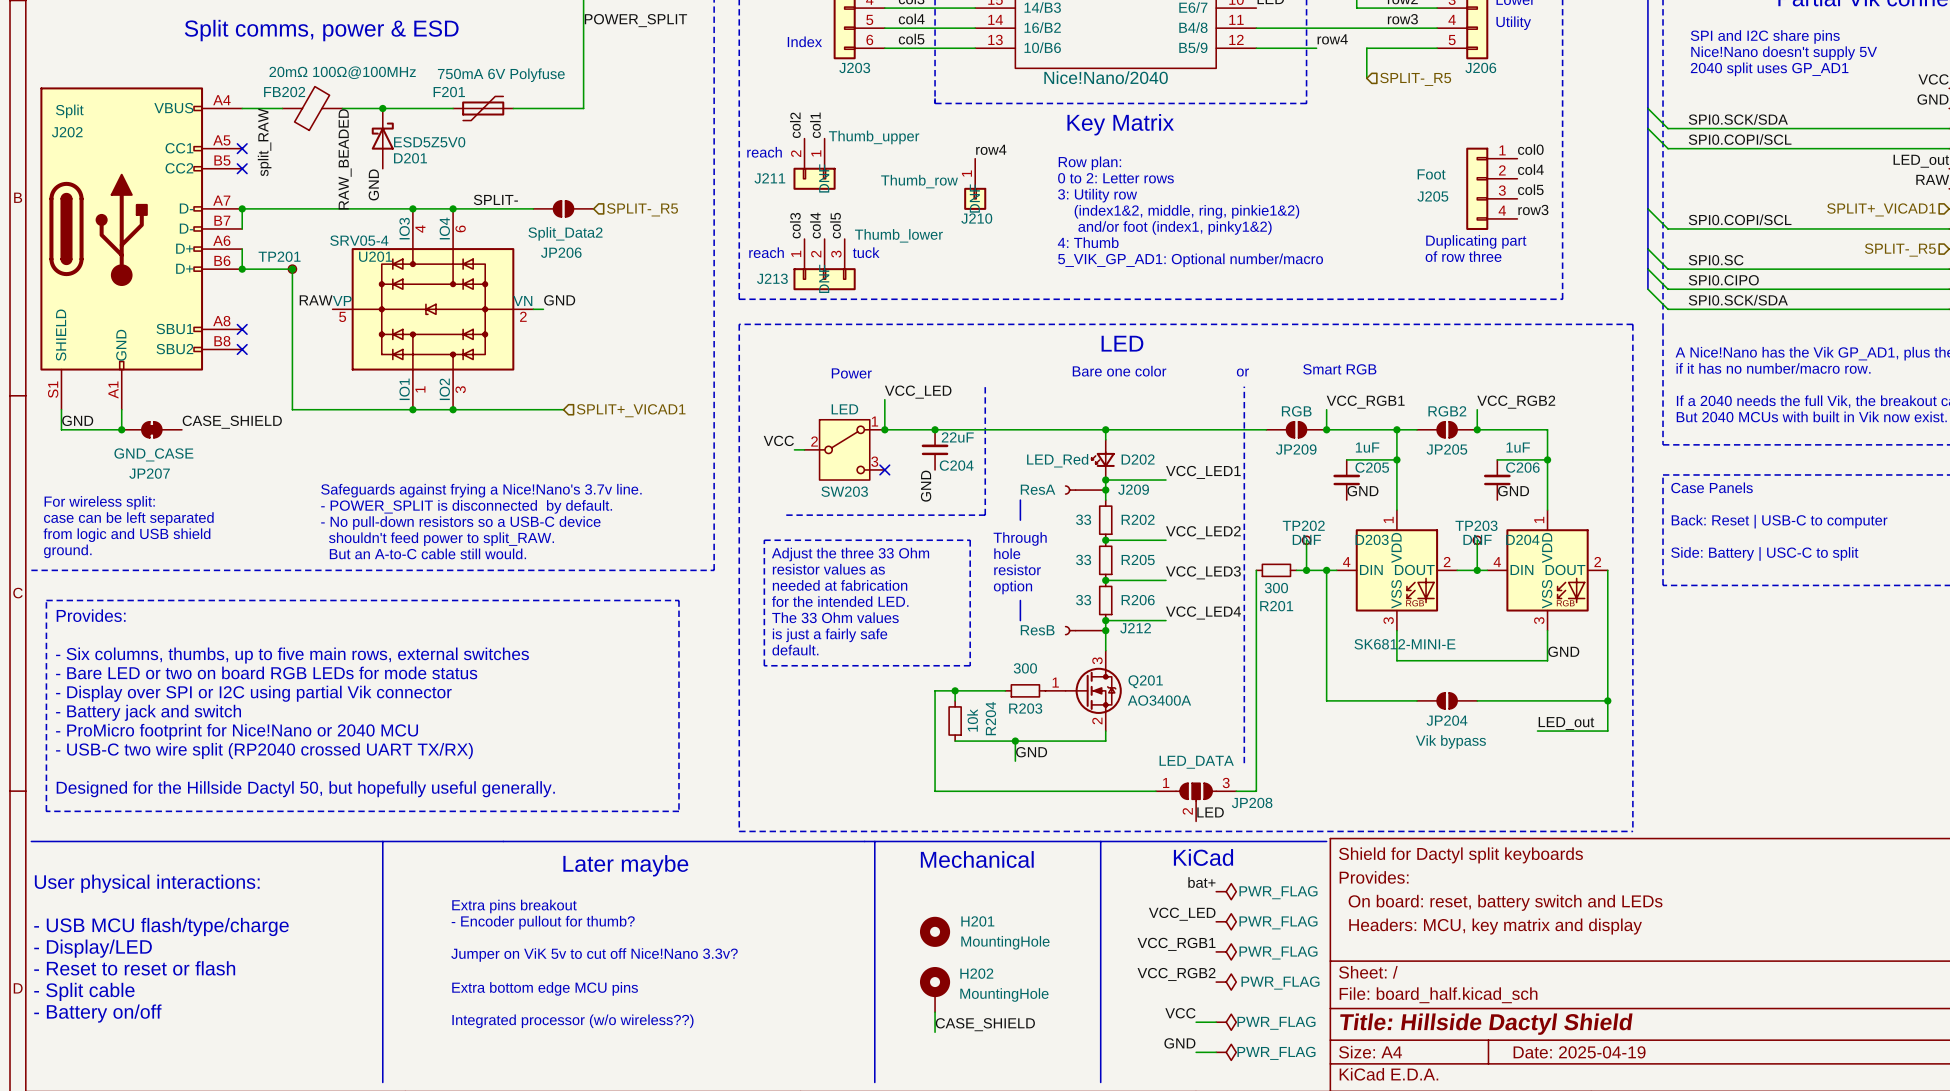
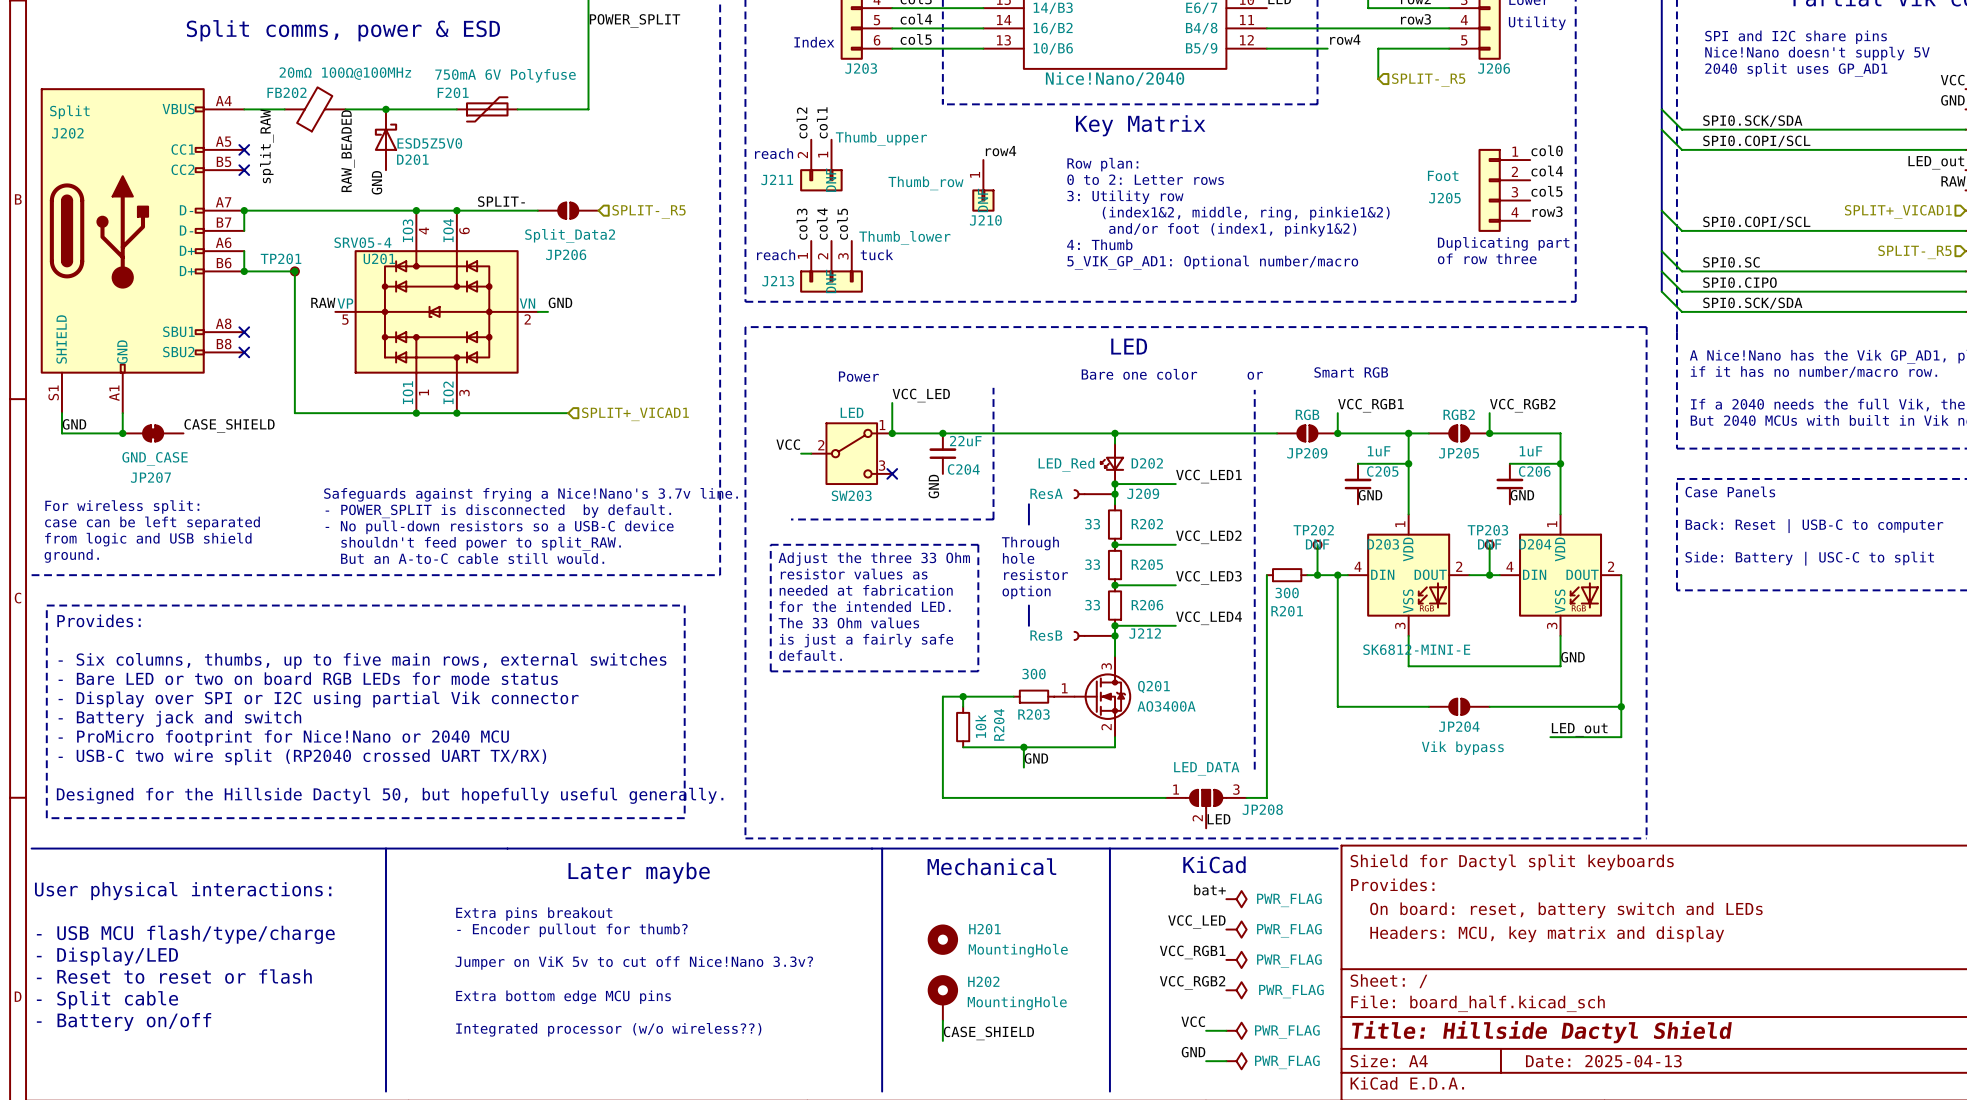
title block: Date: 2025-04-19 (1579, 1052) -> Date: 2025-04-13 (1603, 1061)

